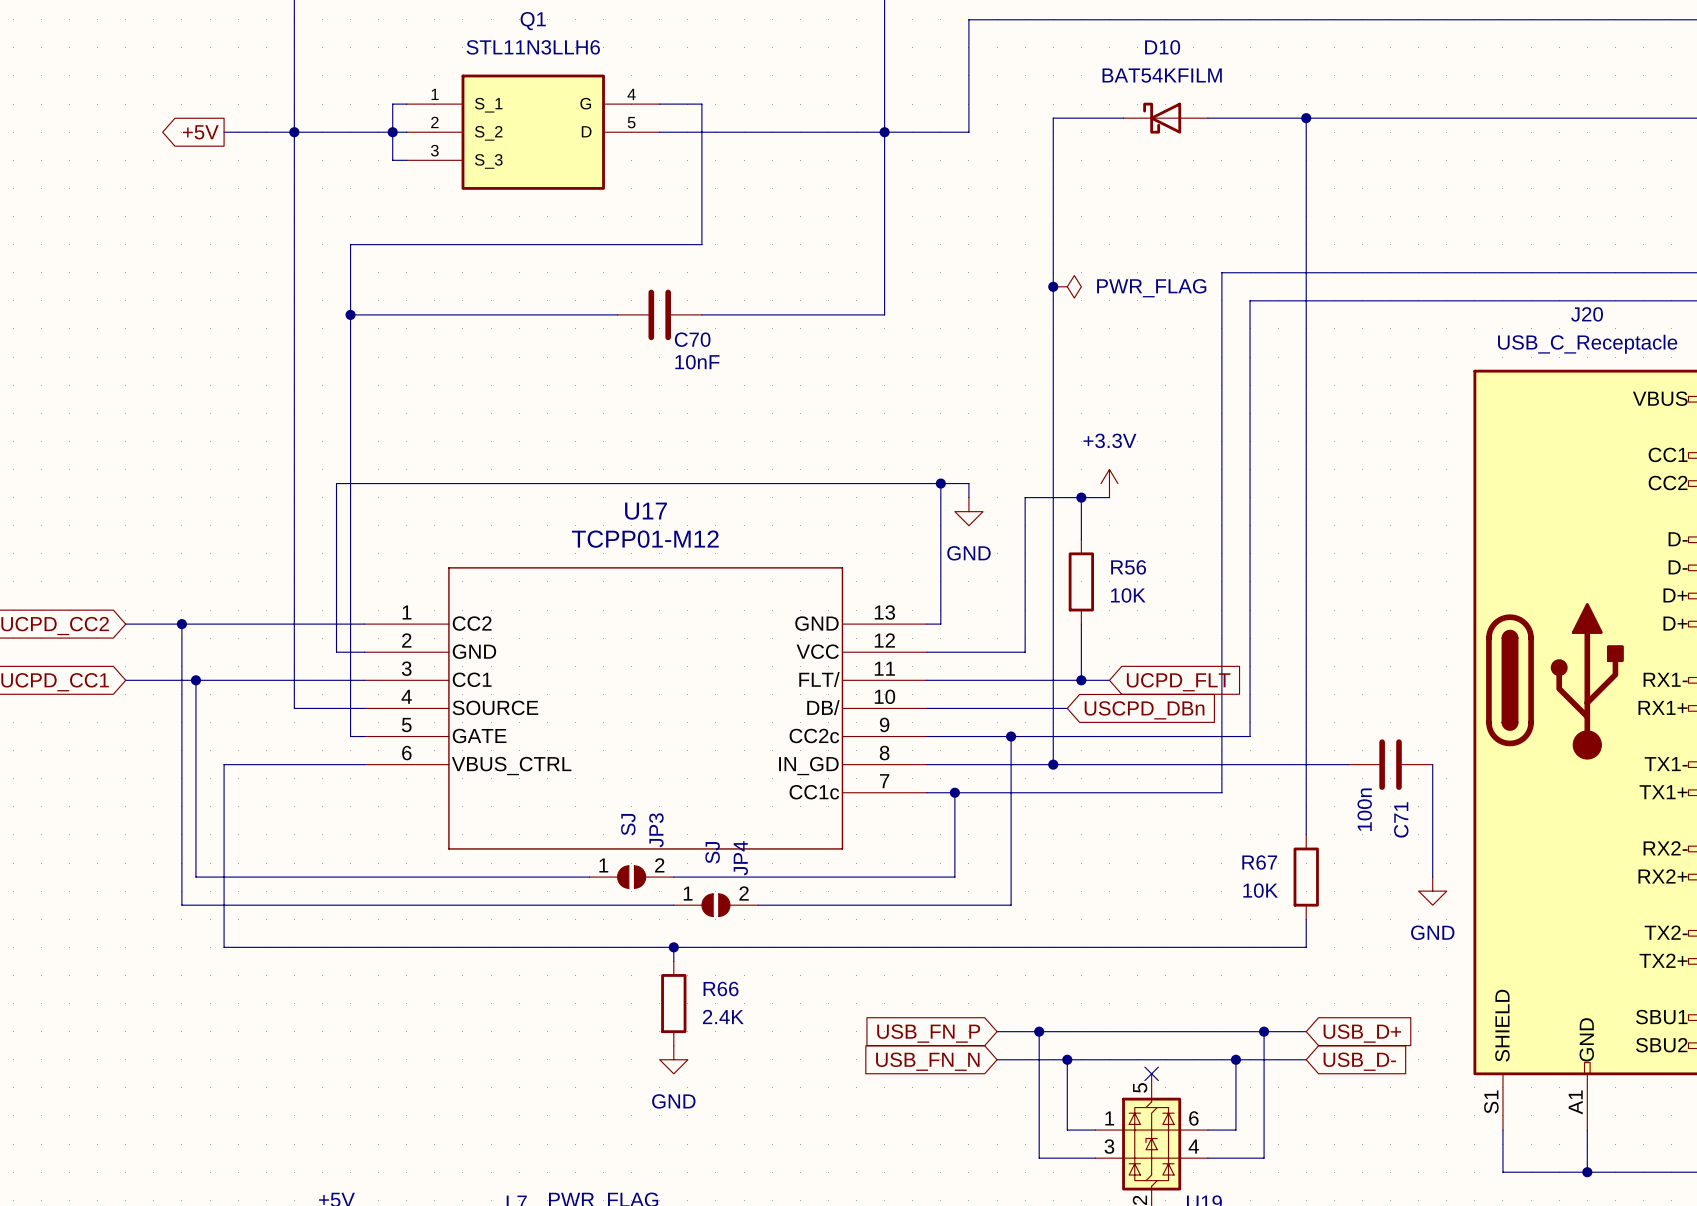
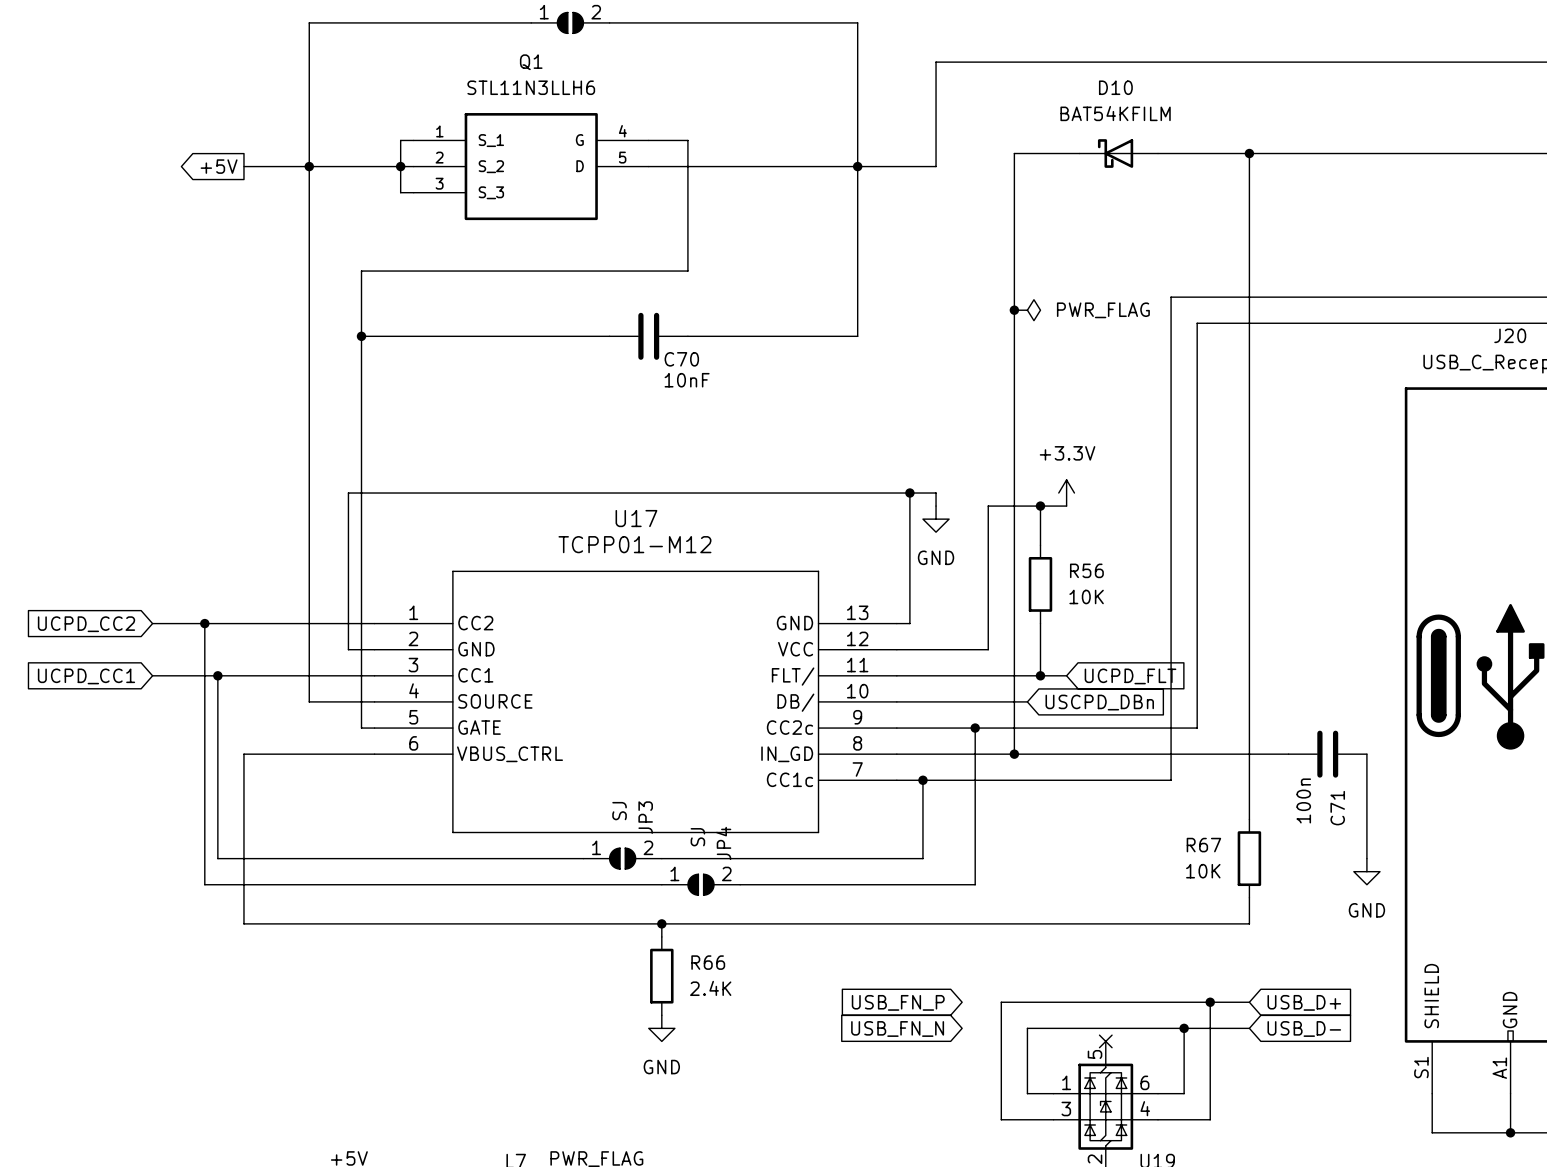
wire: (997, 1031) (1039, 1031) -> none
junction: (1039, 1031) -> none
wire: (997, 1059) (1067, 1059) -> none
junction: (1067, 1059) -> none

